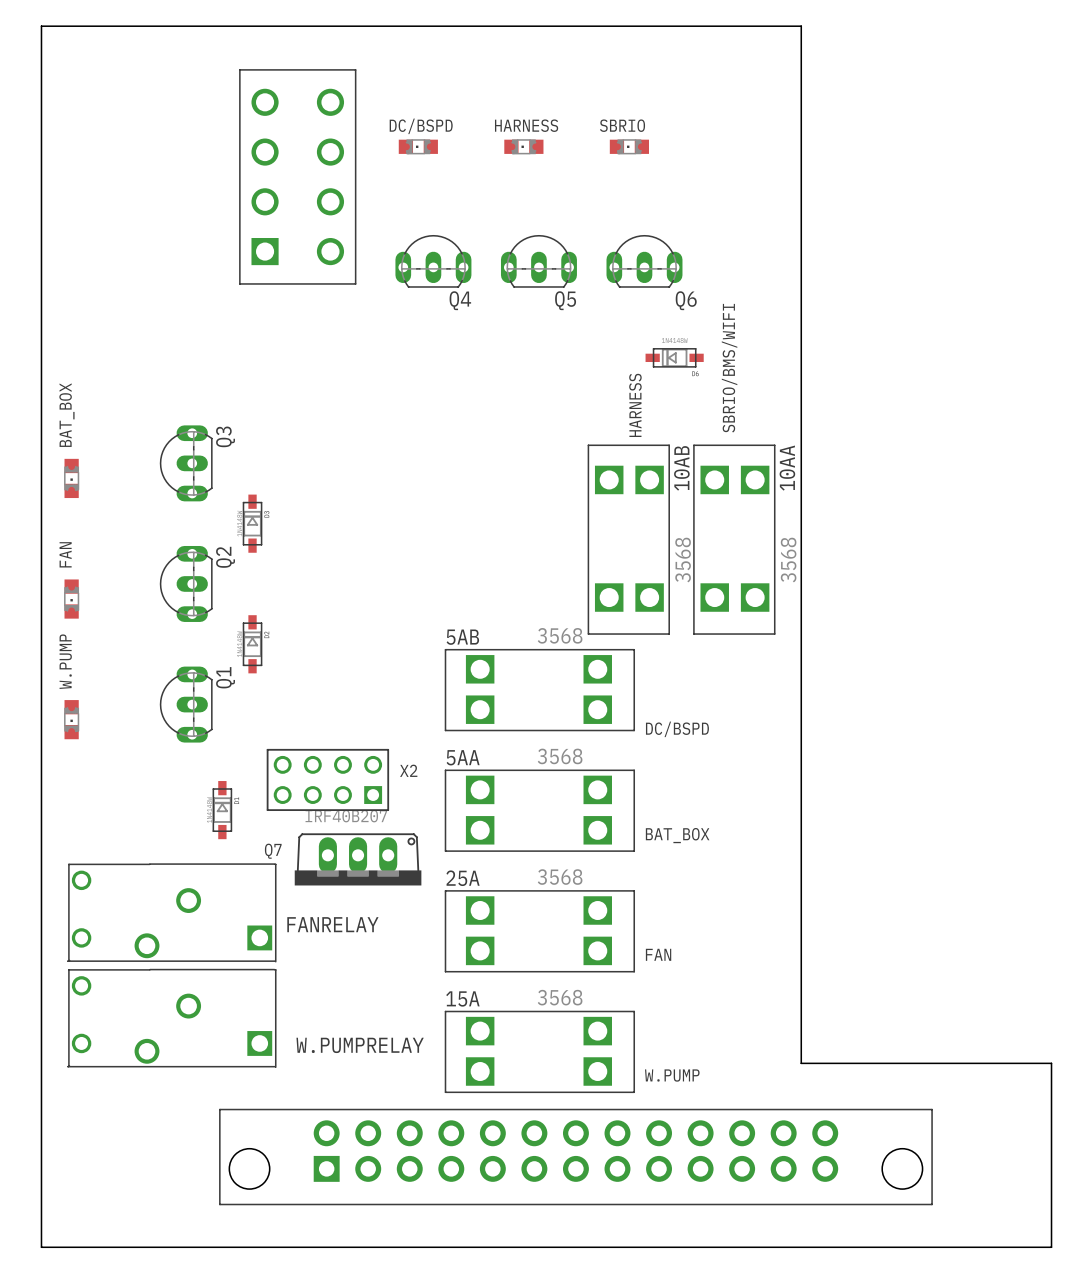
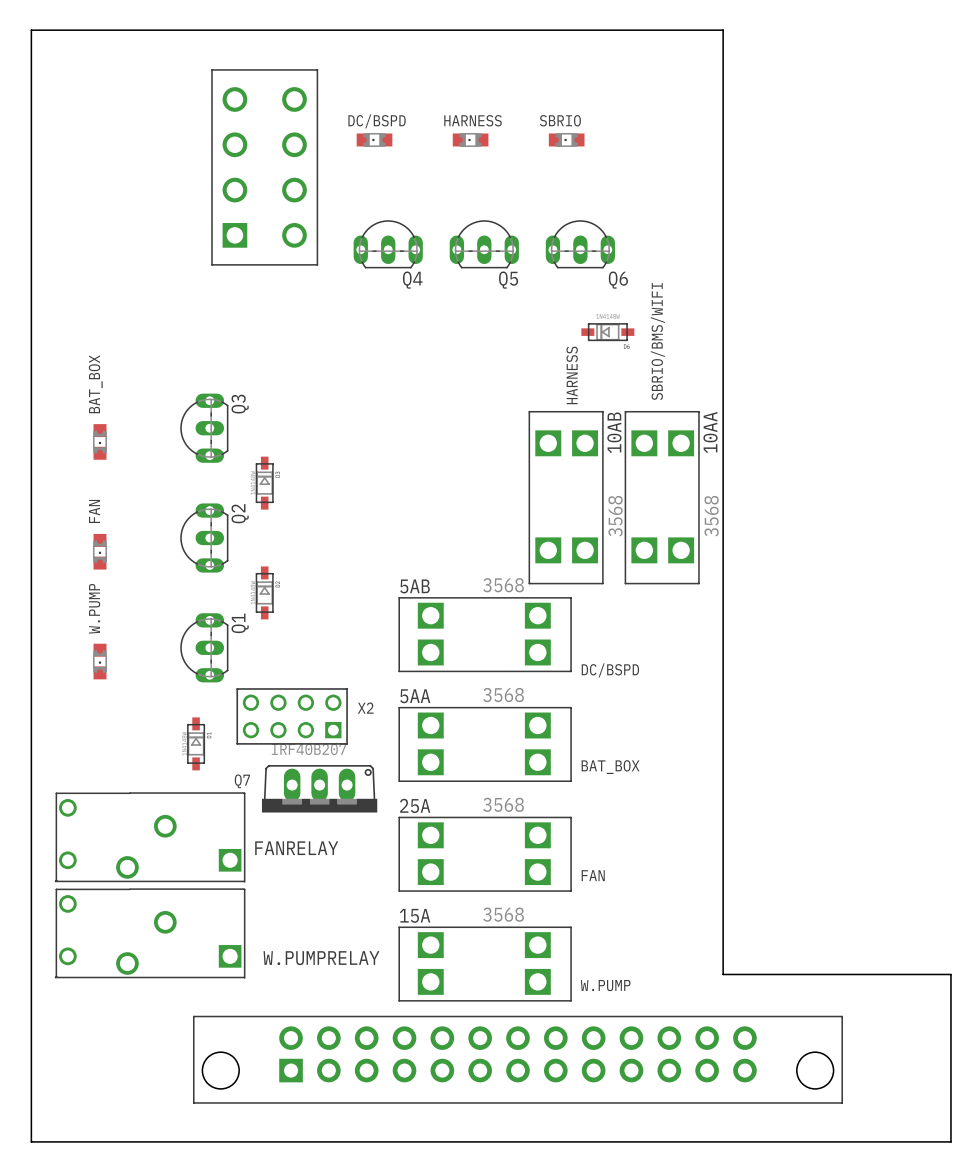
text position: BAT_BOX (66, 415) -> BAT_BOX (95, 384)
Q3 position: (186, 463) -> (204, 428)
part position: (71, 478) -> (100, 441)
part position: (252, 523) -> (264, 483)
text position: FAN (65, 554) -> FAN (94, 511)
Q2 position: (186, 583) -> (204, 538)
part position: (71, 599) -> (100, 551)
part position: (252, 644) -> (264, 592)
text position: W.PUMP (65, 661) -> W.PUMP (94, 608)
Q1 position: (186, 704) -> (204, 647)
part position: (71, 719) -> (100, 661)

